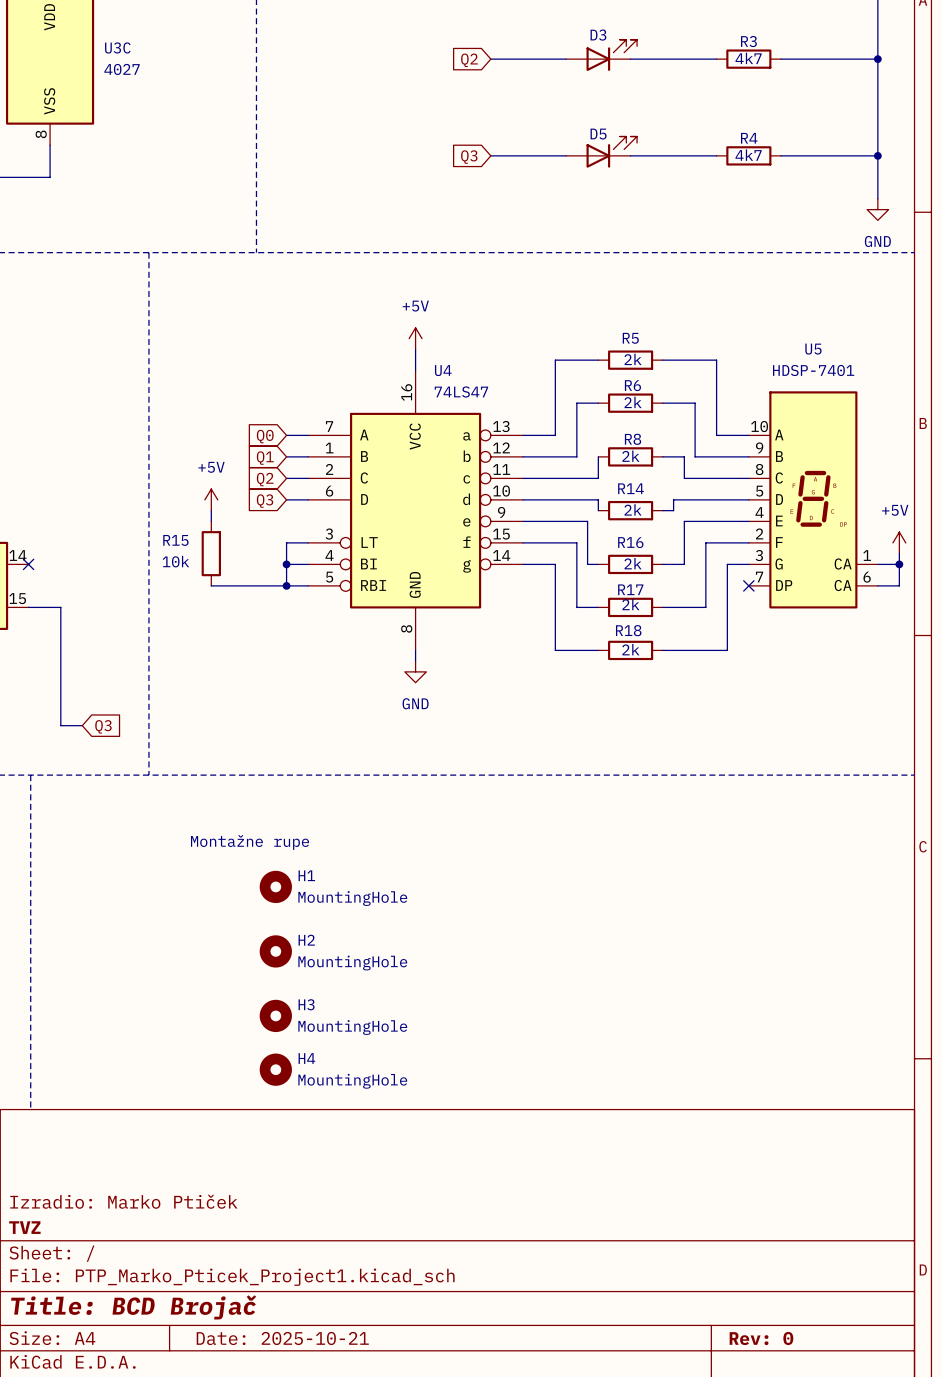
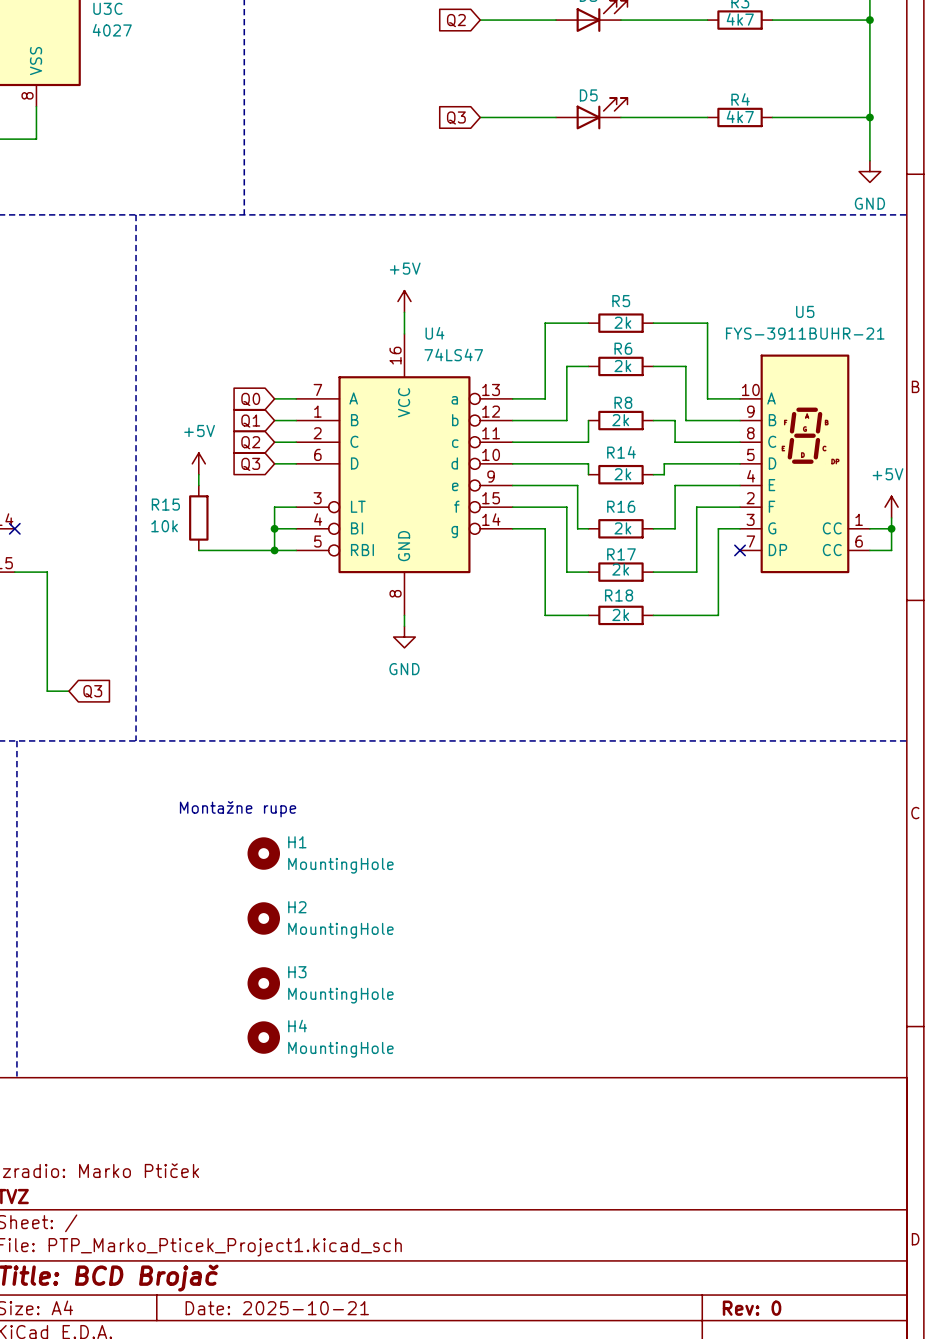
U5 value: HDSP-7401 (813, 370) -> FYS-3911BUHR-21 (805, 333)
U5 symbol: [748, 391, 878, 609] -> [740, 354, 870, 574]

